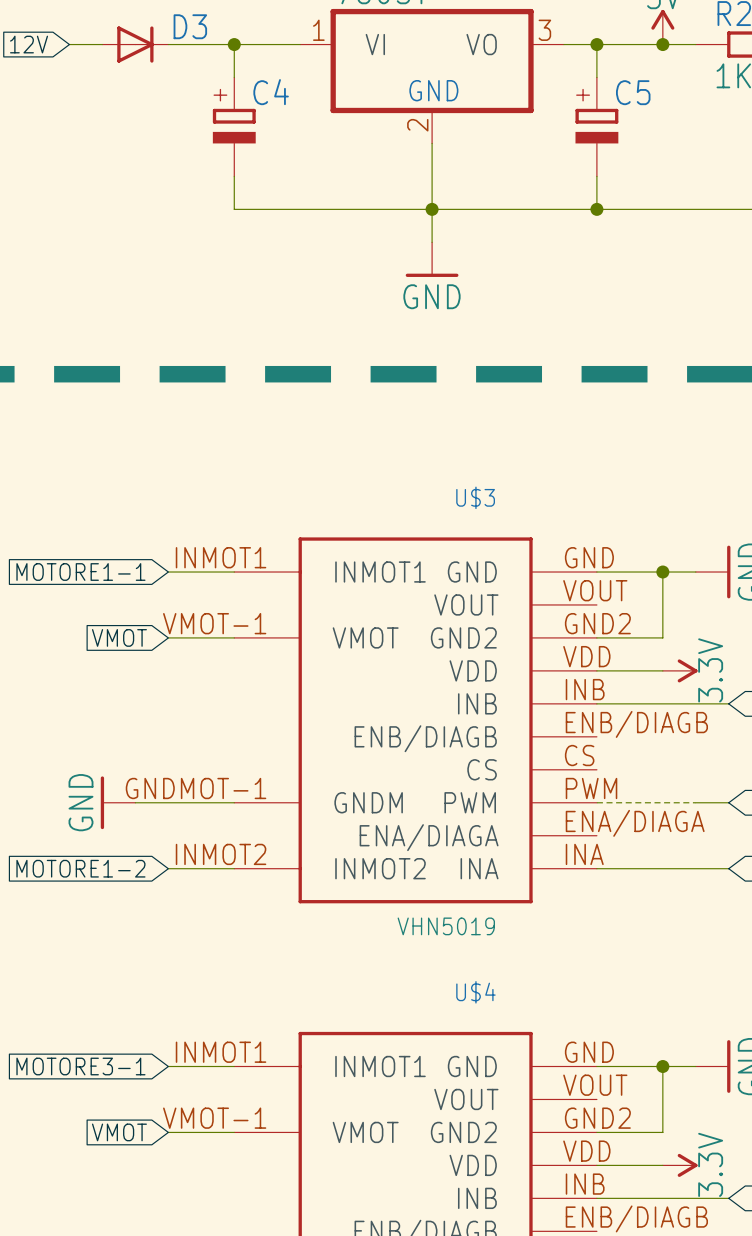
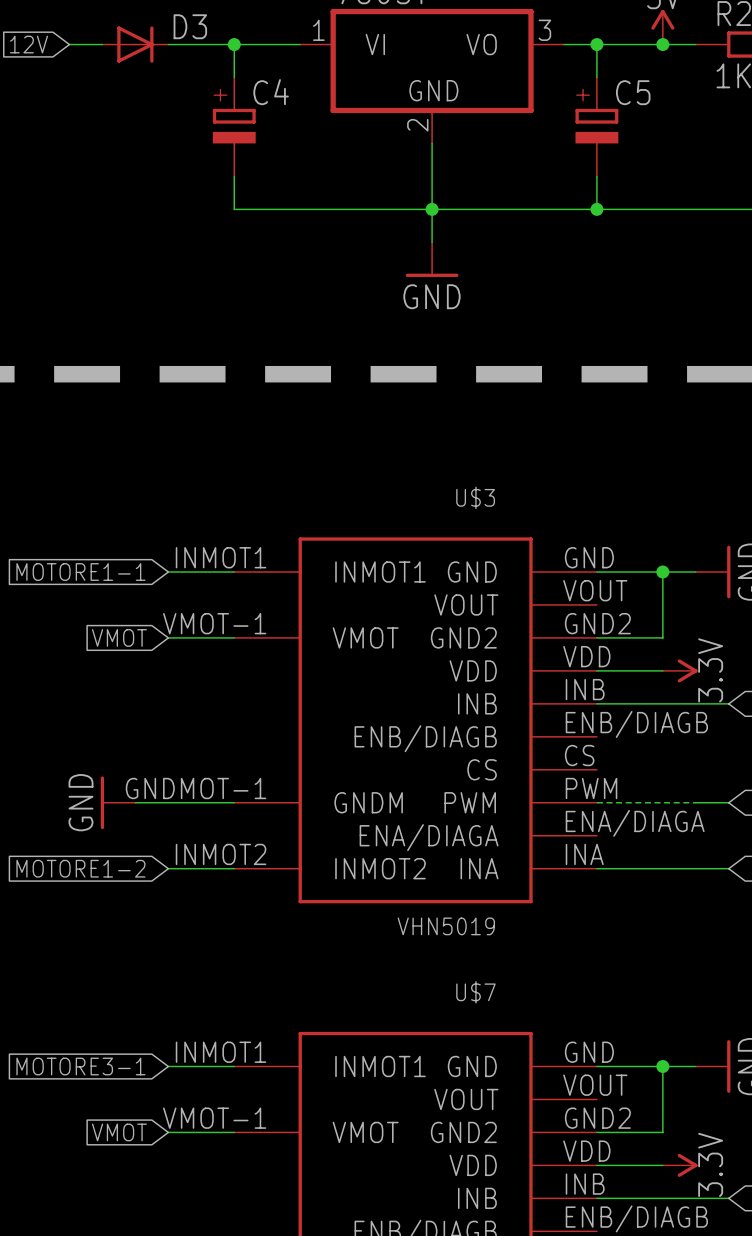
U$4 name: U$4 (475, 992) -> U$7 (475, 992)

